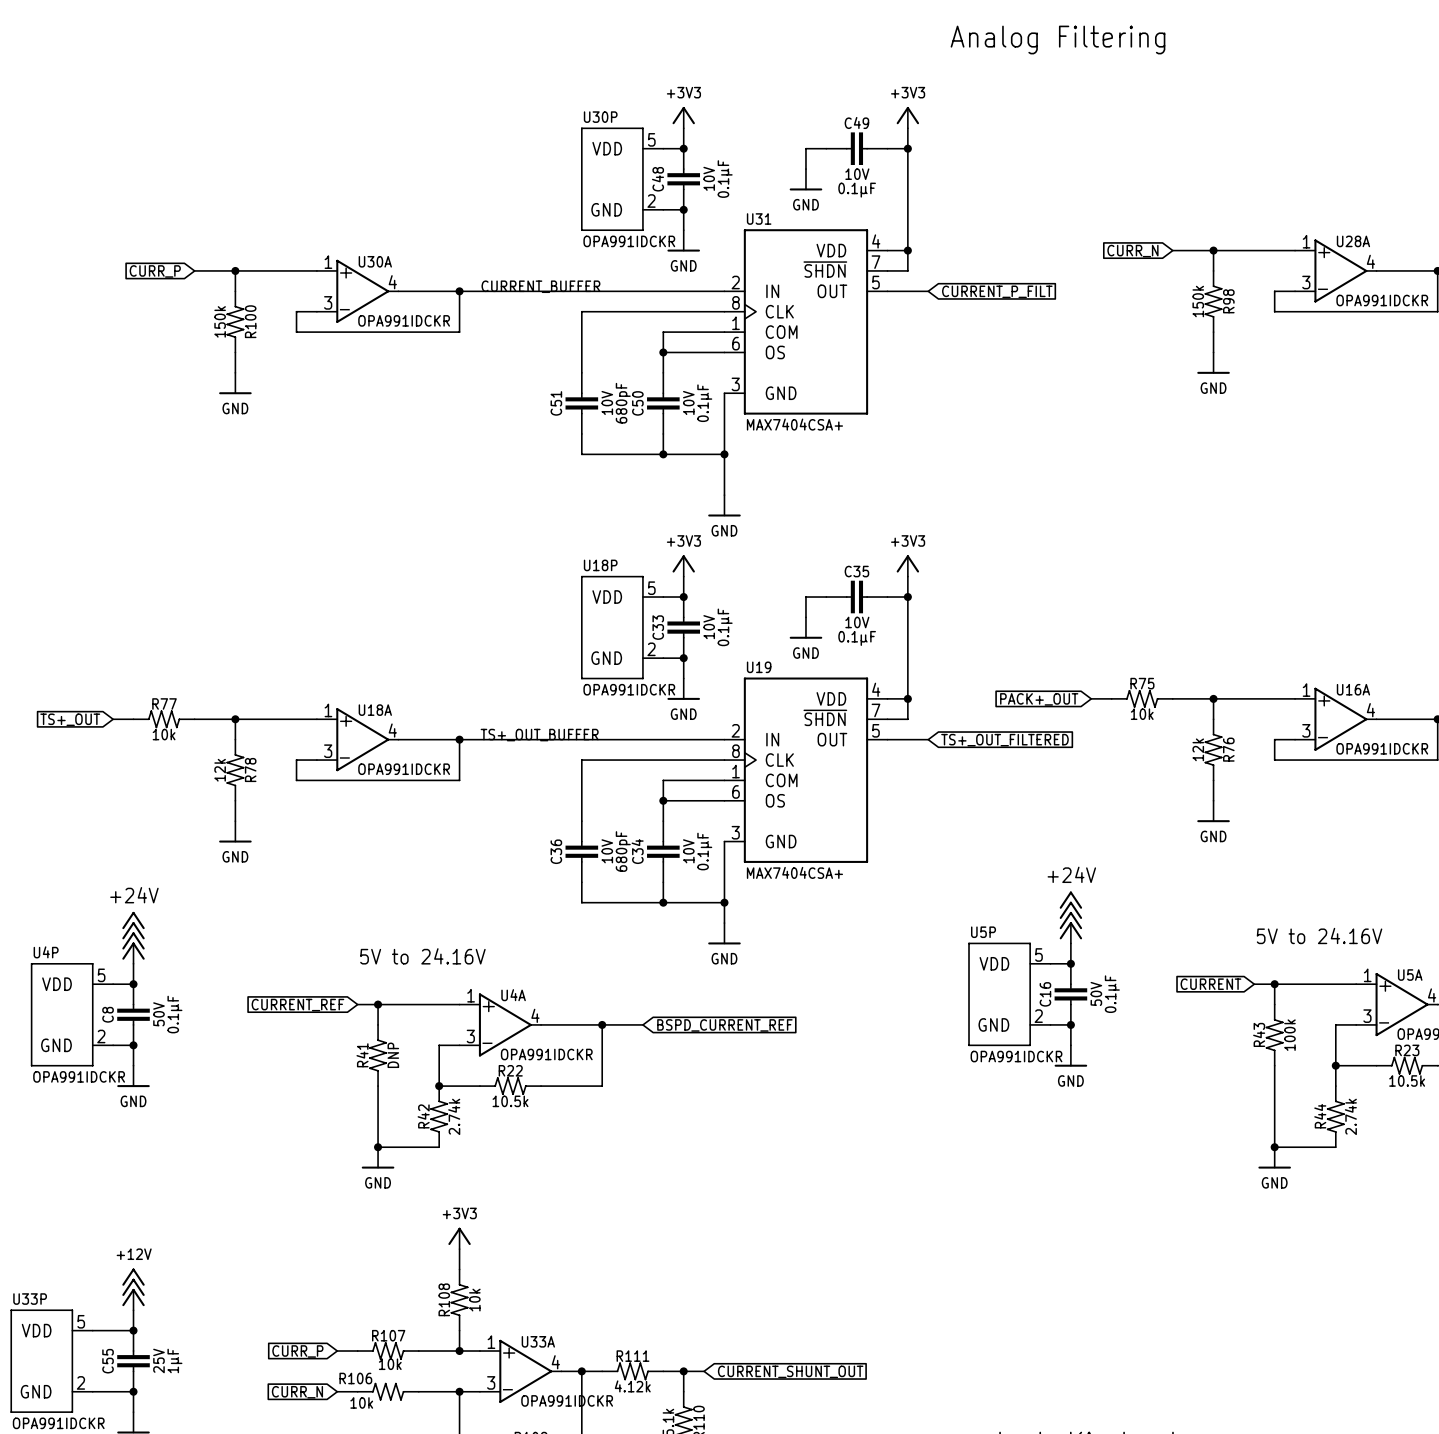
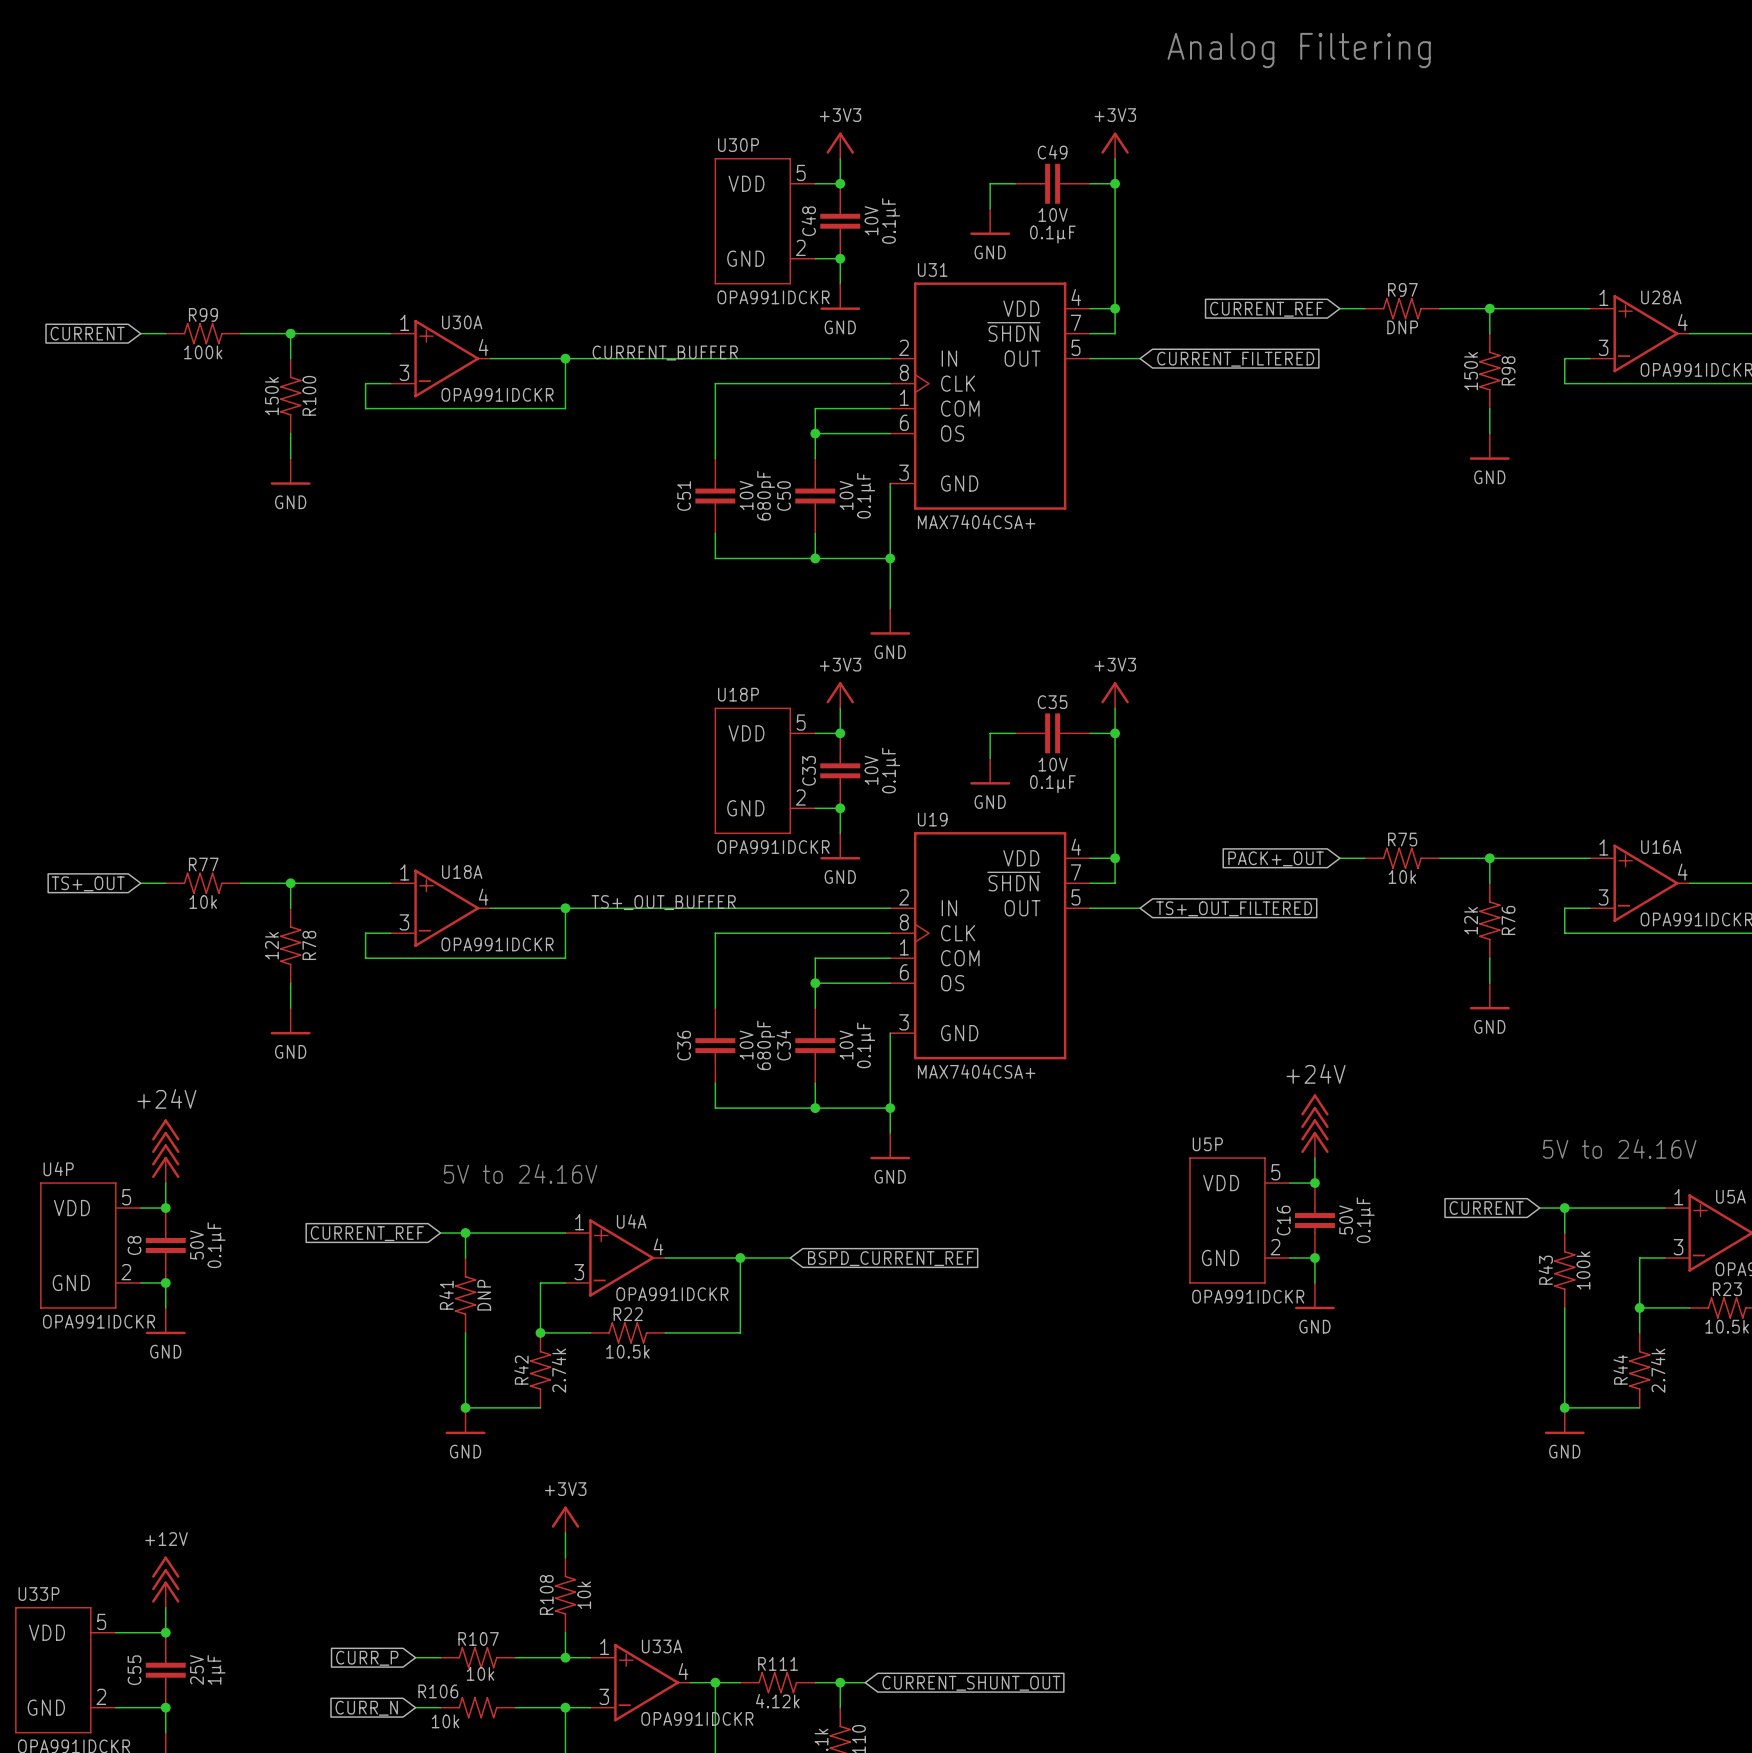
wire: none -> (1339, 308) (1364, 308)
R97: none -> (1402, 308)
global label: none -> CURRENT_REF (1266, 309)
global label: CURR_N (1132, 251) -> none
wire: none -> (140, 333) (165, 333)
R99: none -> (203, 333)
global label: CURR_P (155, 271) -> CURRENT (87, 333)
global label: CURRENT_P_FILT (997, 291) -> CURRENT_FILTERED (1235, 359)

